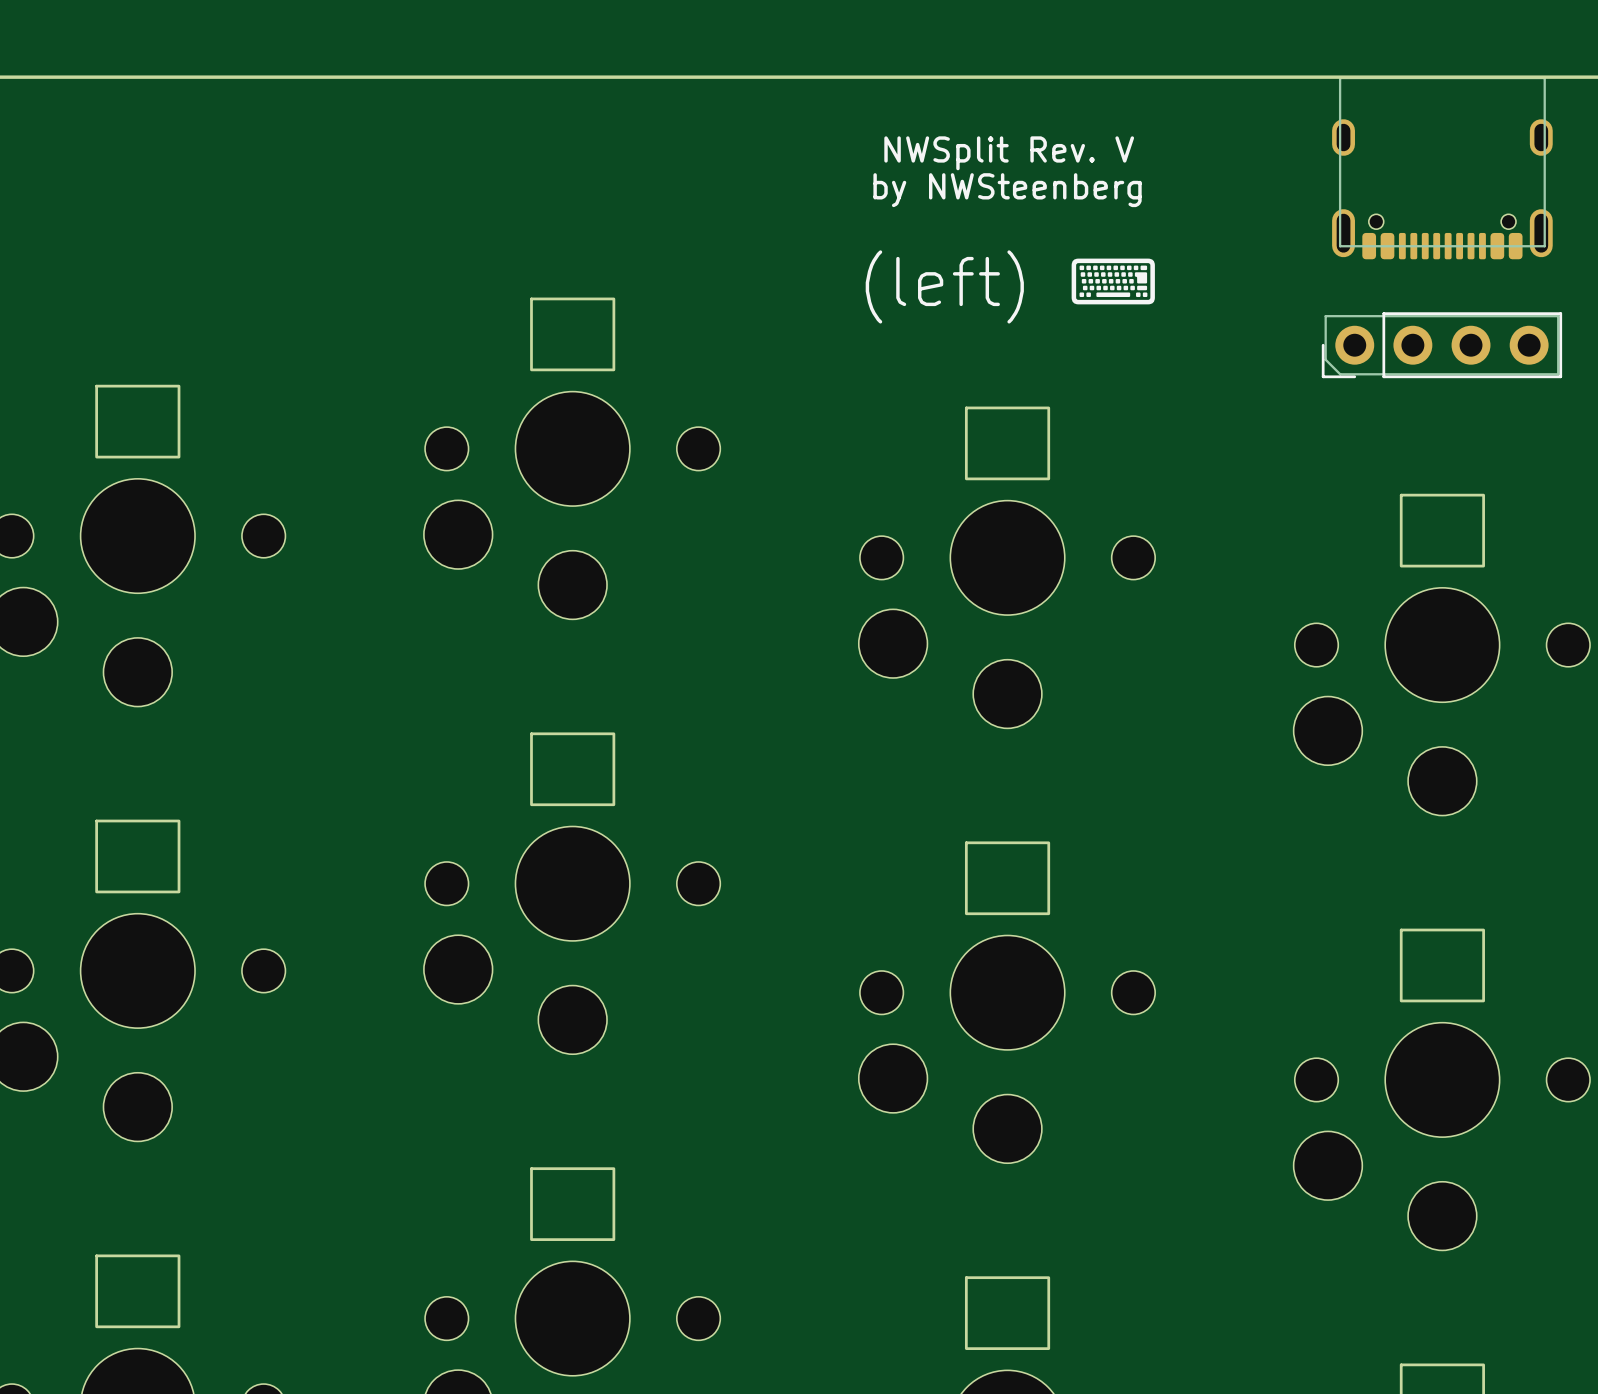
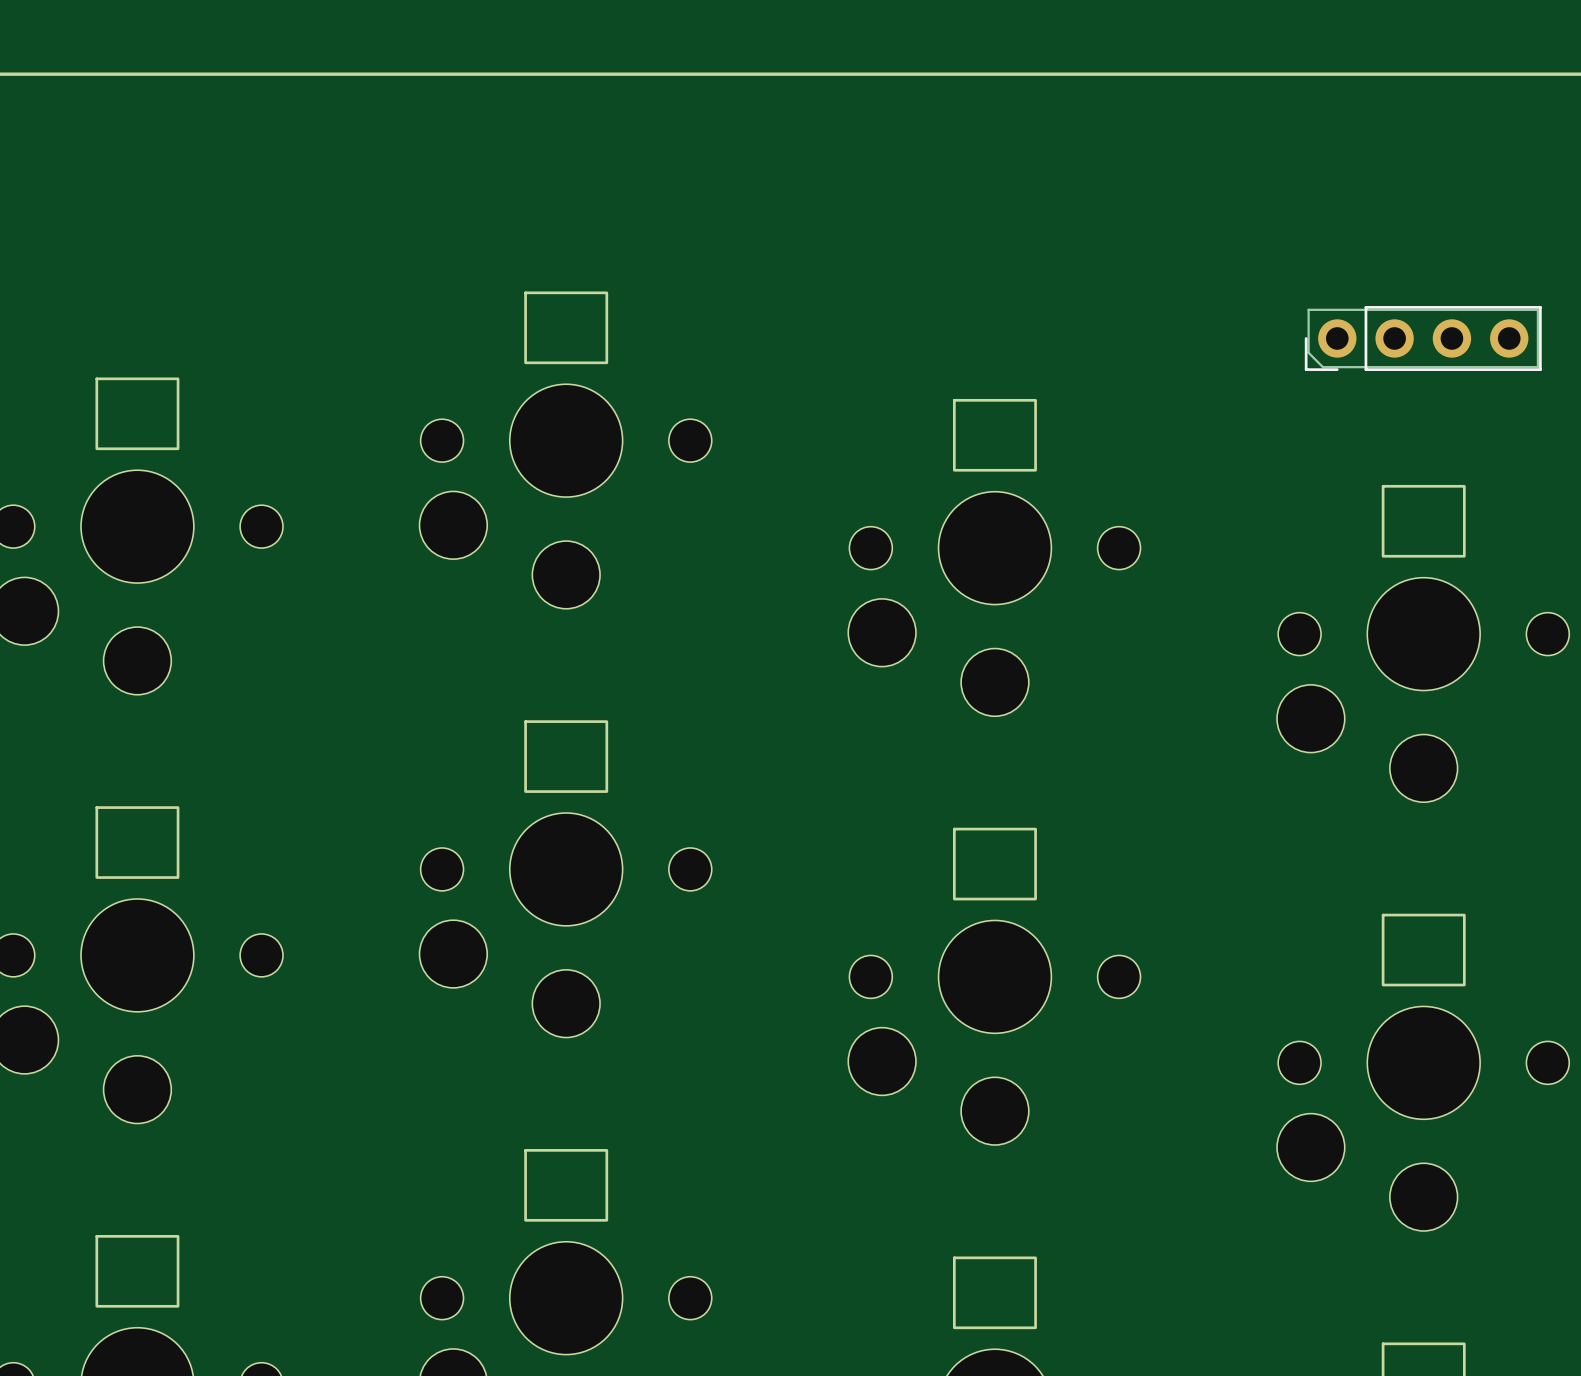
text: NWSplit Rev. V (1009, 153) -> none
part: (1442, 168) -> none
text: by NWSteenberg (1007, 190) -> none
text: (left) ⌨ (1011, 286) -> none

